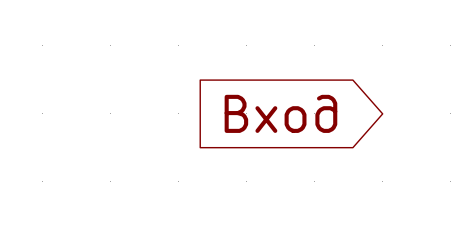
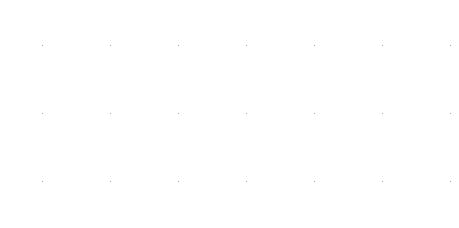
global label: Вход (280, 113) -> none

